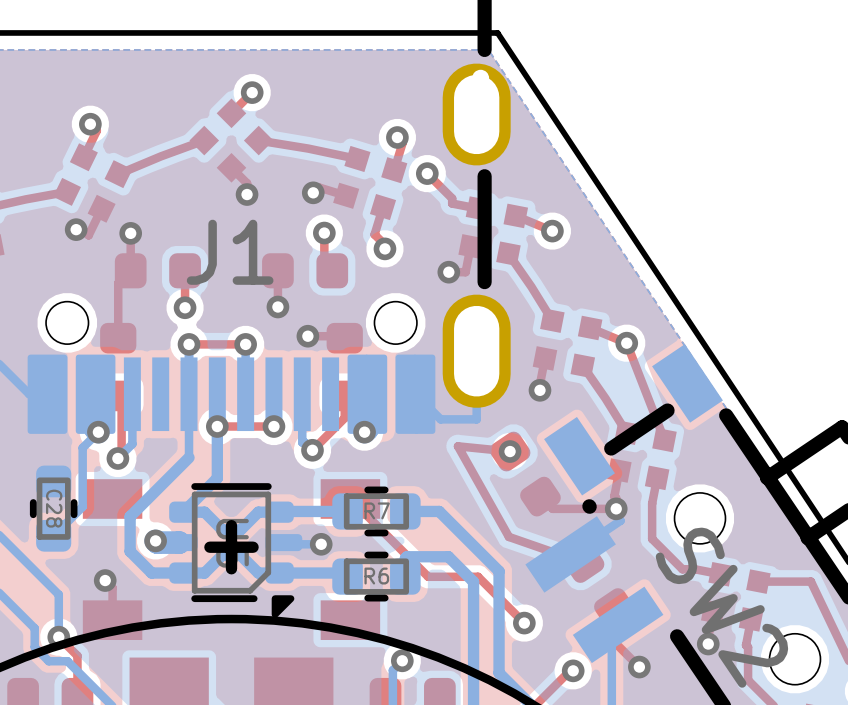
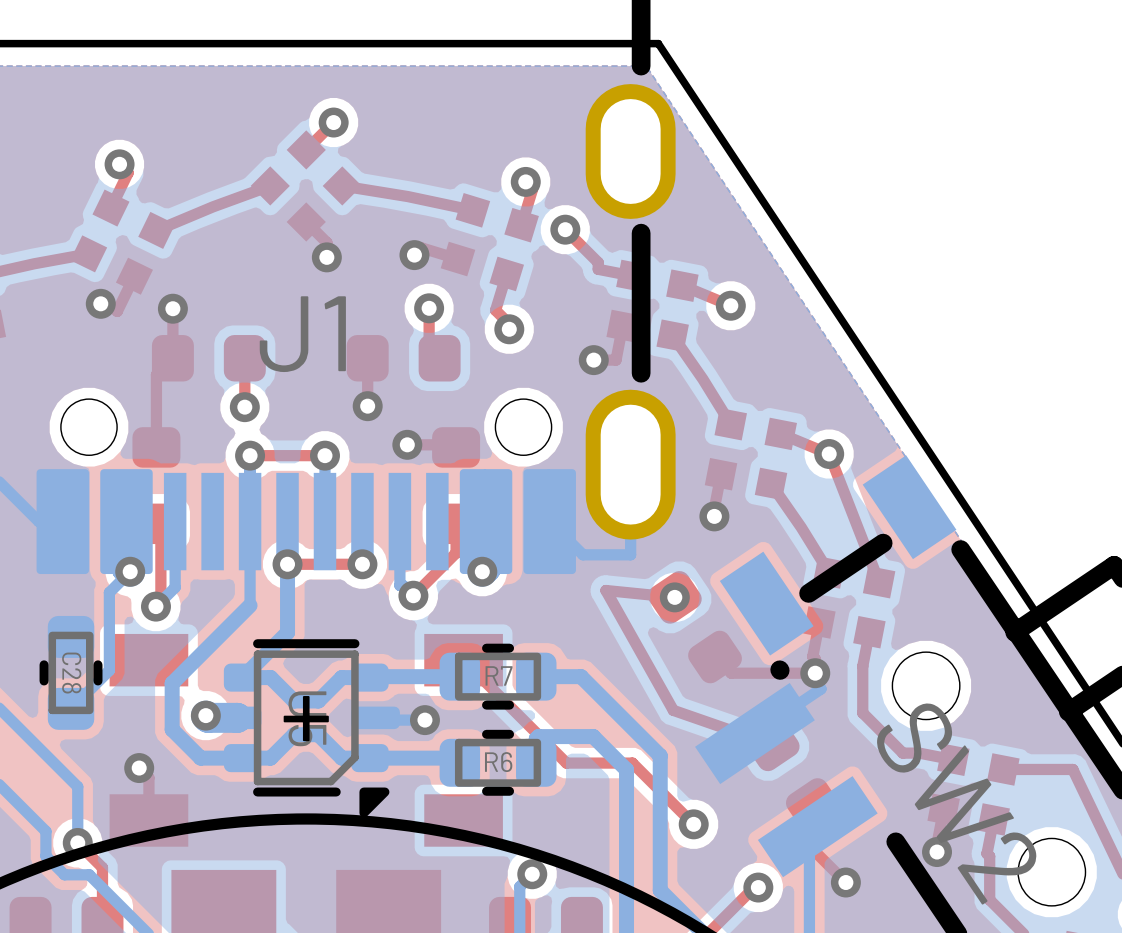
via: (480, 78) -> none

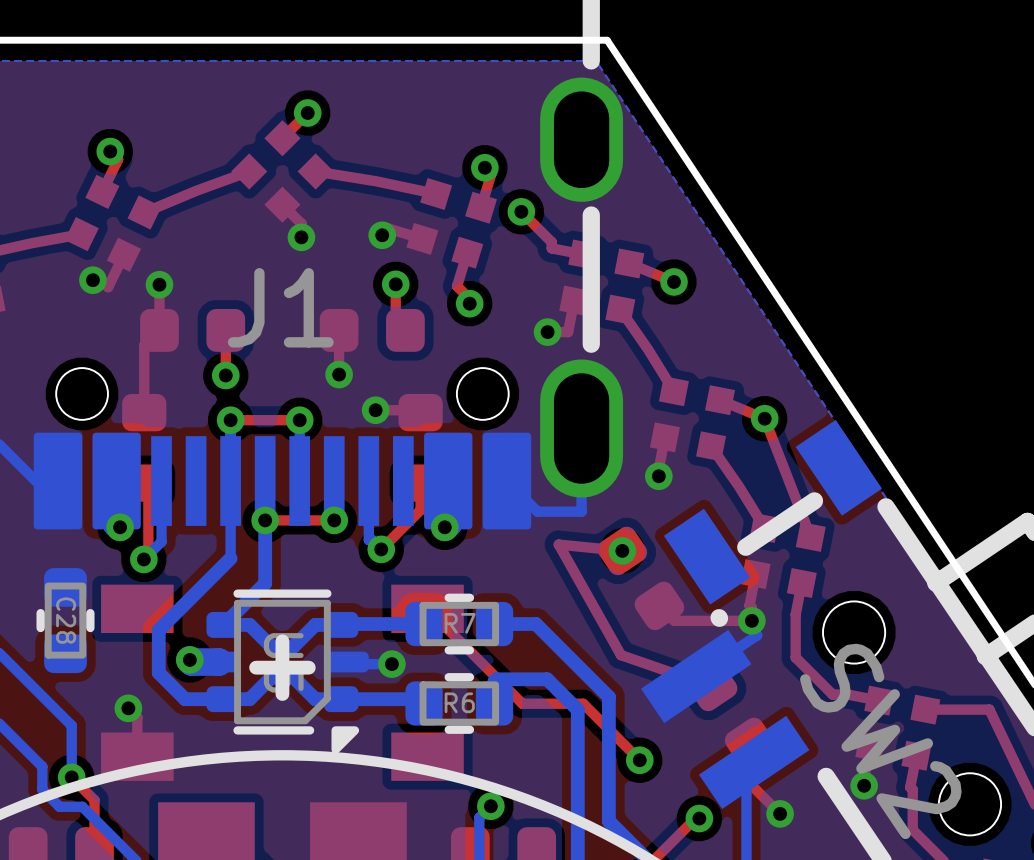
bottom track: (130, 571) (109, 592) (109, 670) (71, 708) -> none

